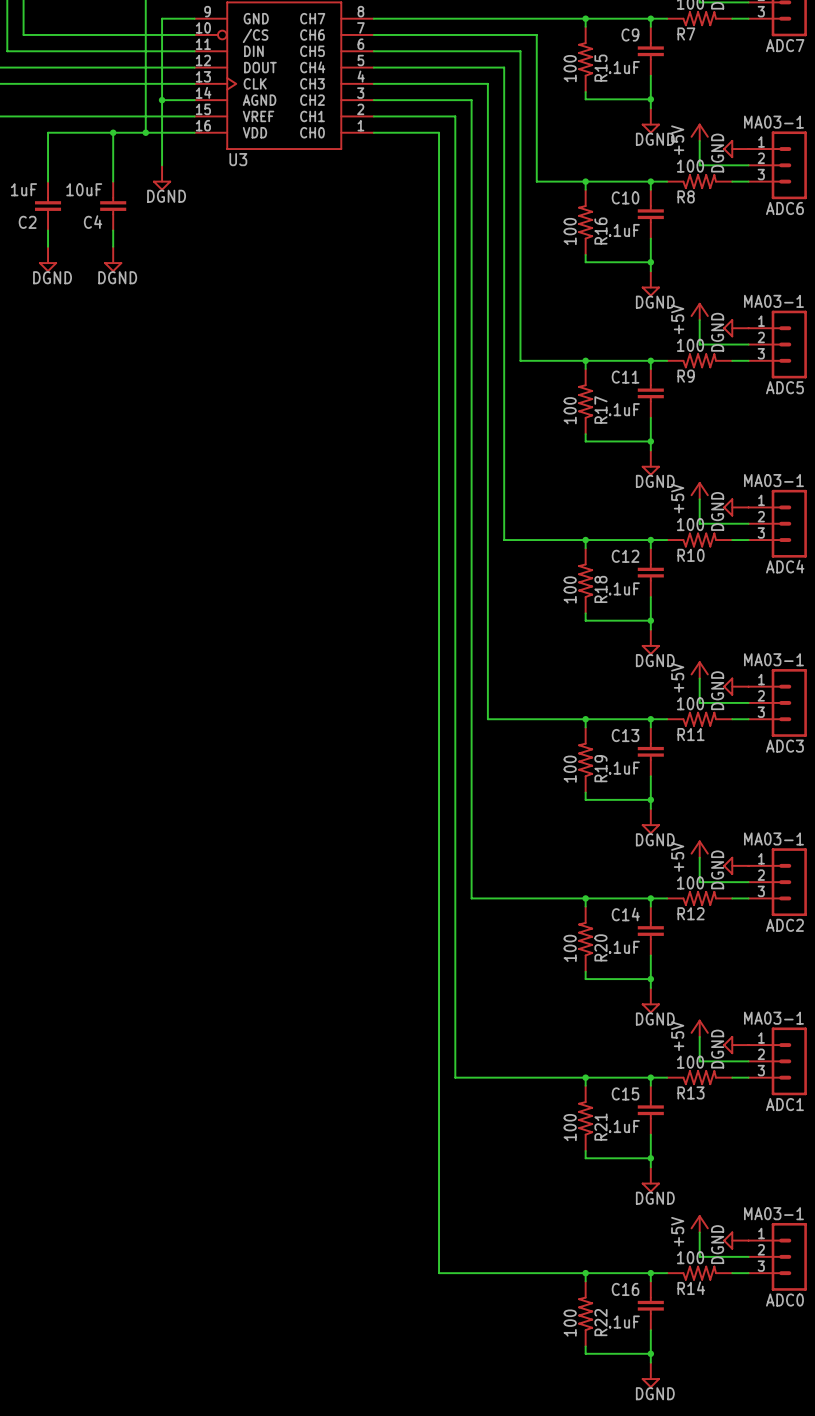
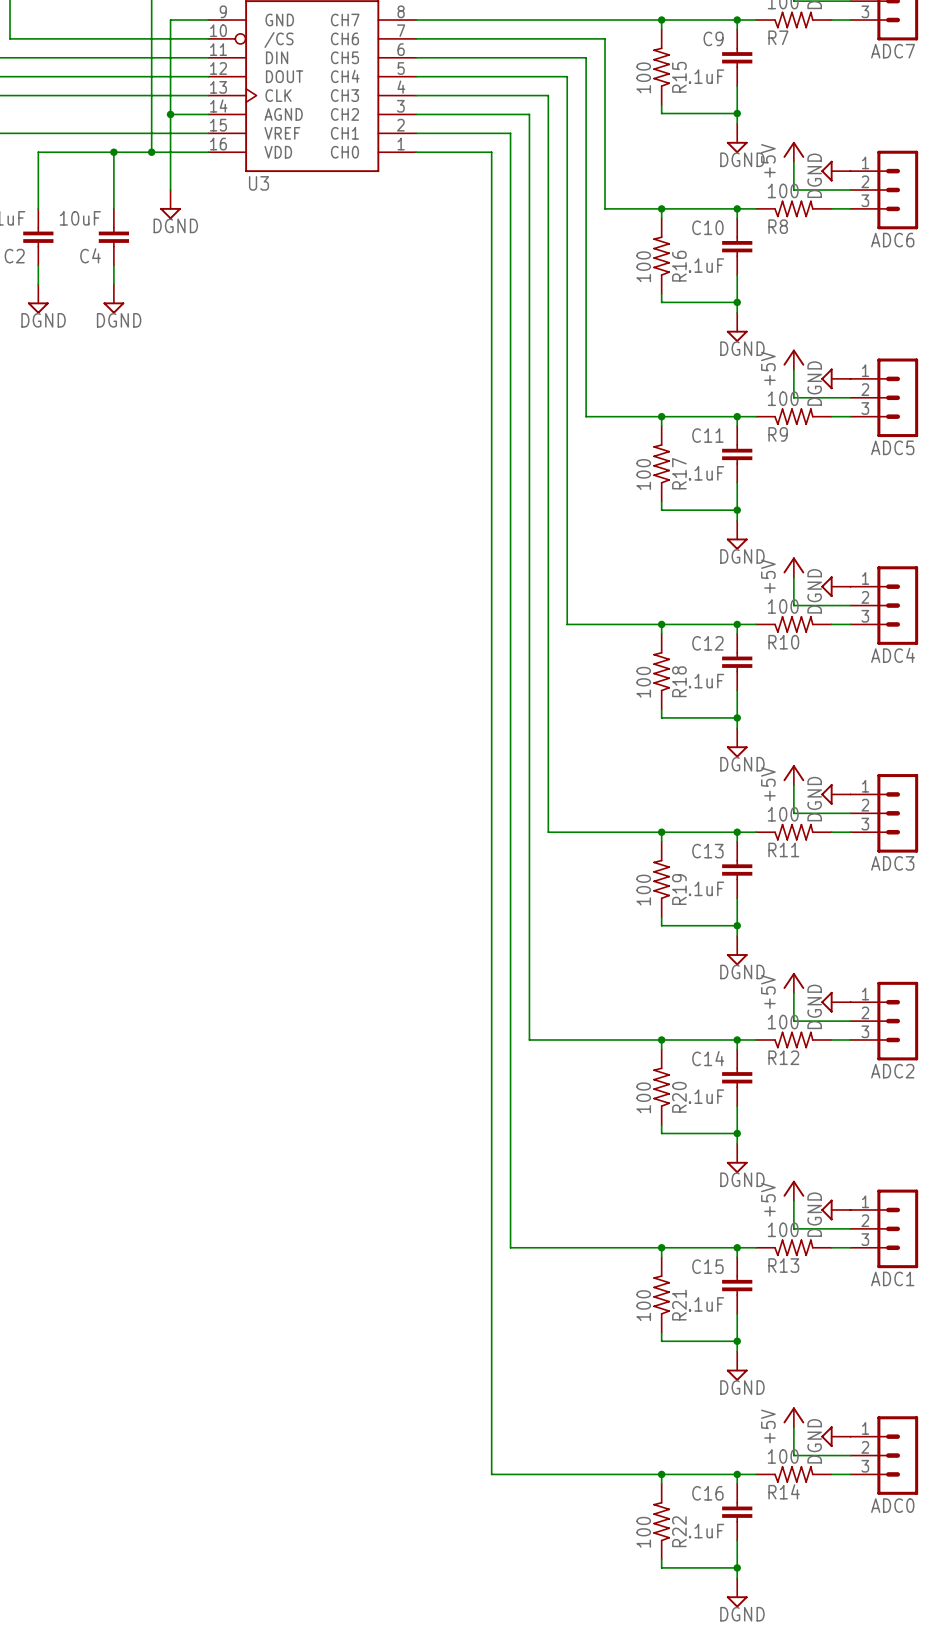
ADC6 value: MA03-1 (773, 122) -> none
ADC5 value: MA03-1 (773, 301) -> none
ADC4 value: MA03-1 (773, 480) -> none
ADC3 value: MA03-1 (773, 659) -> none
ADC2 value: MA03-1 (773, 838) -> none
ADC1 value: MA03-1 (773, 1018) -> none
ADC0 value: MA03-1 (773, 1213) -> none

